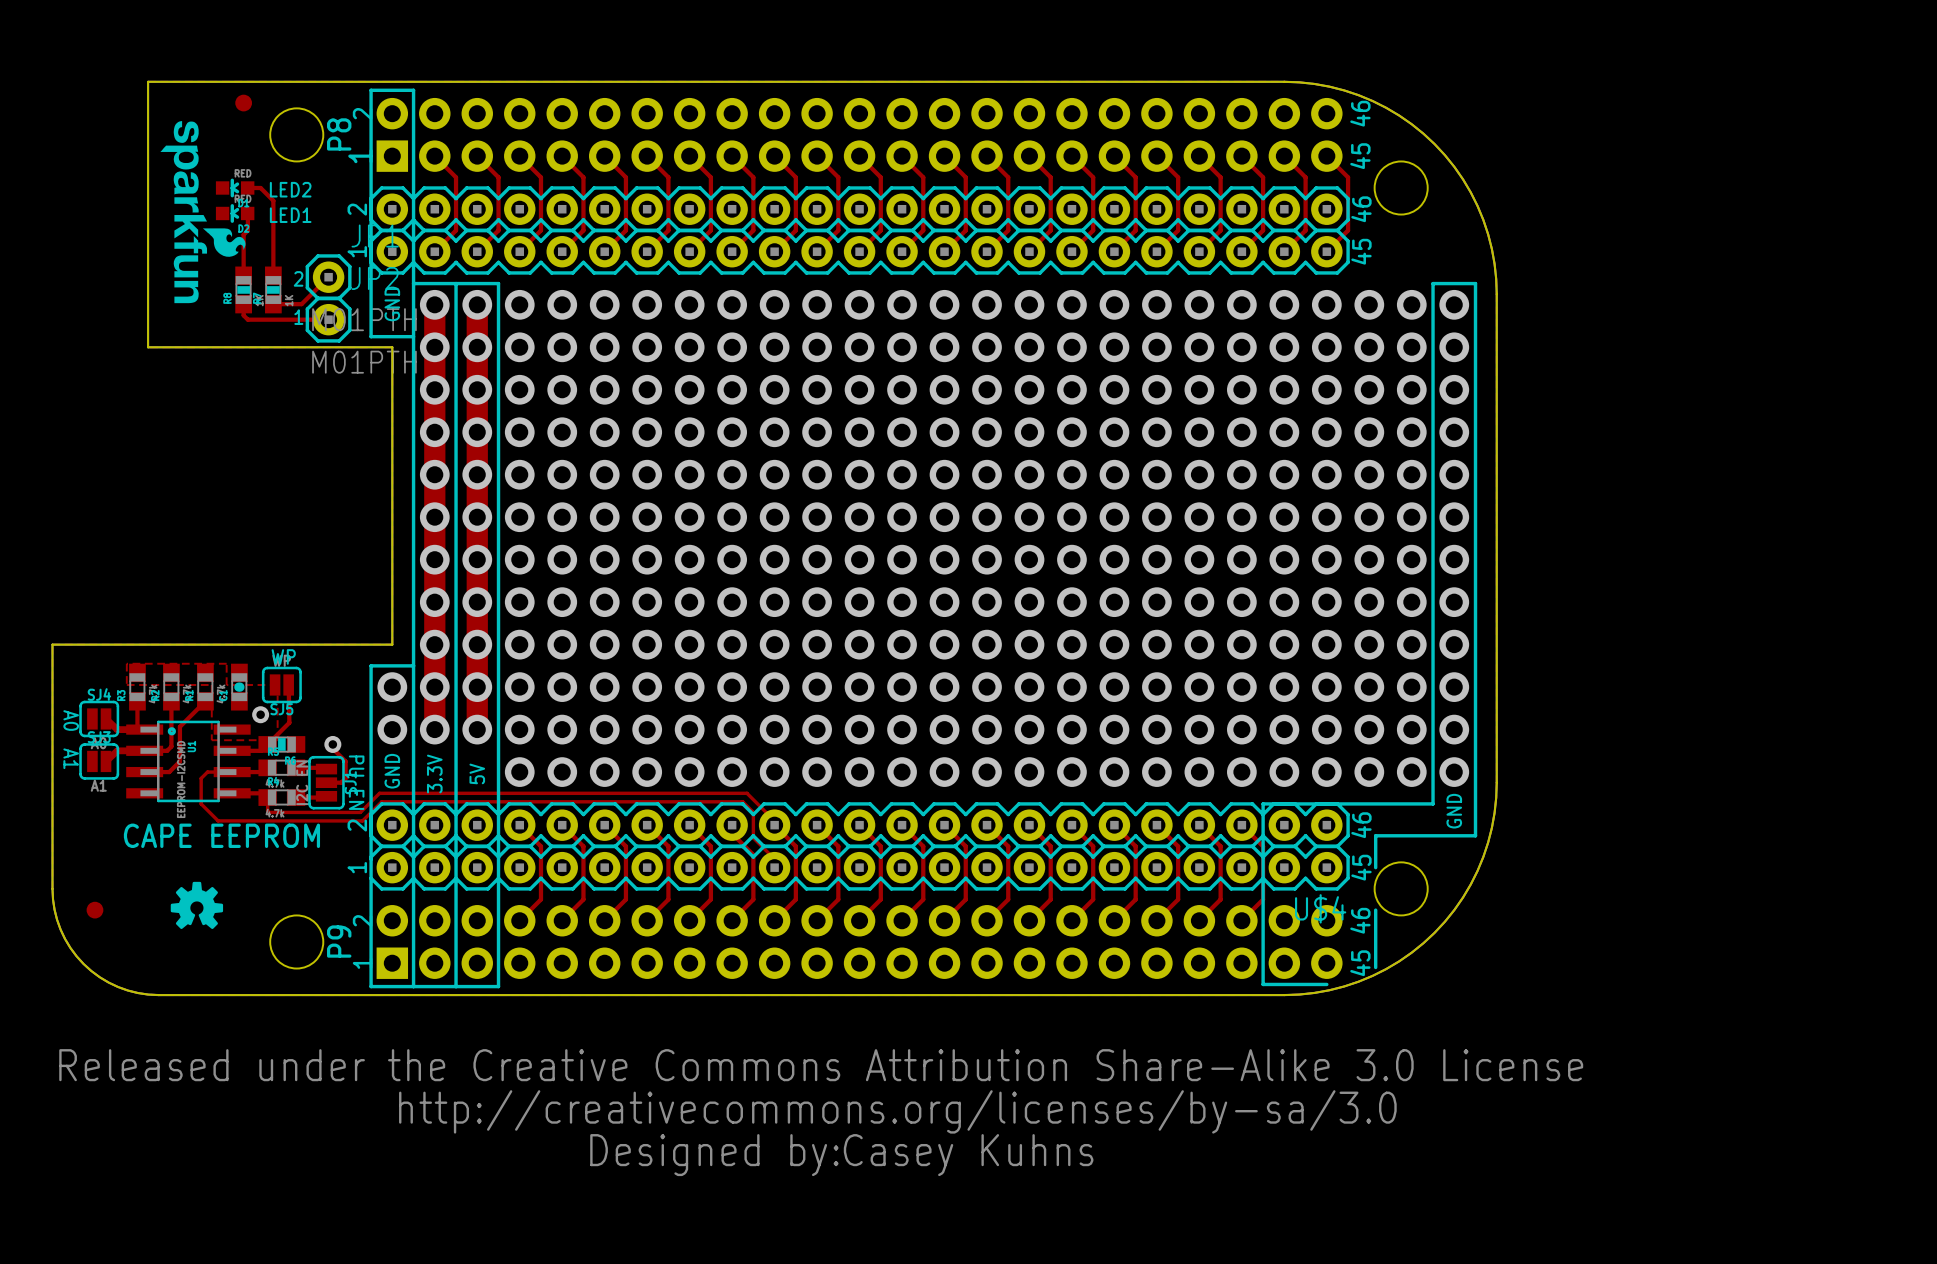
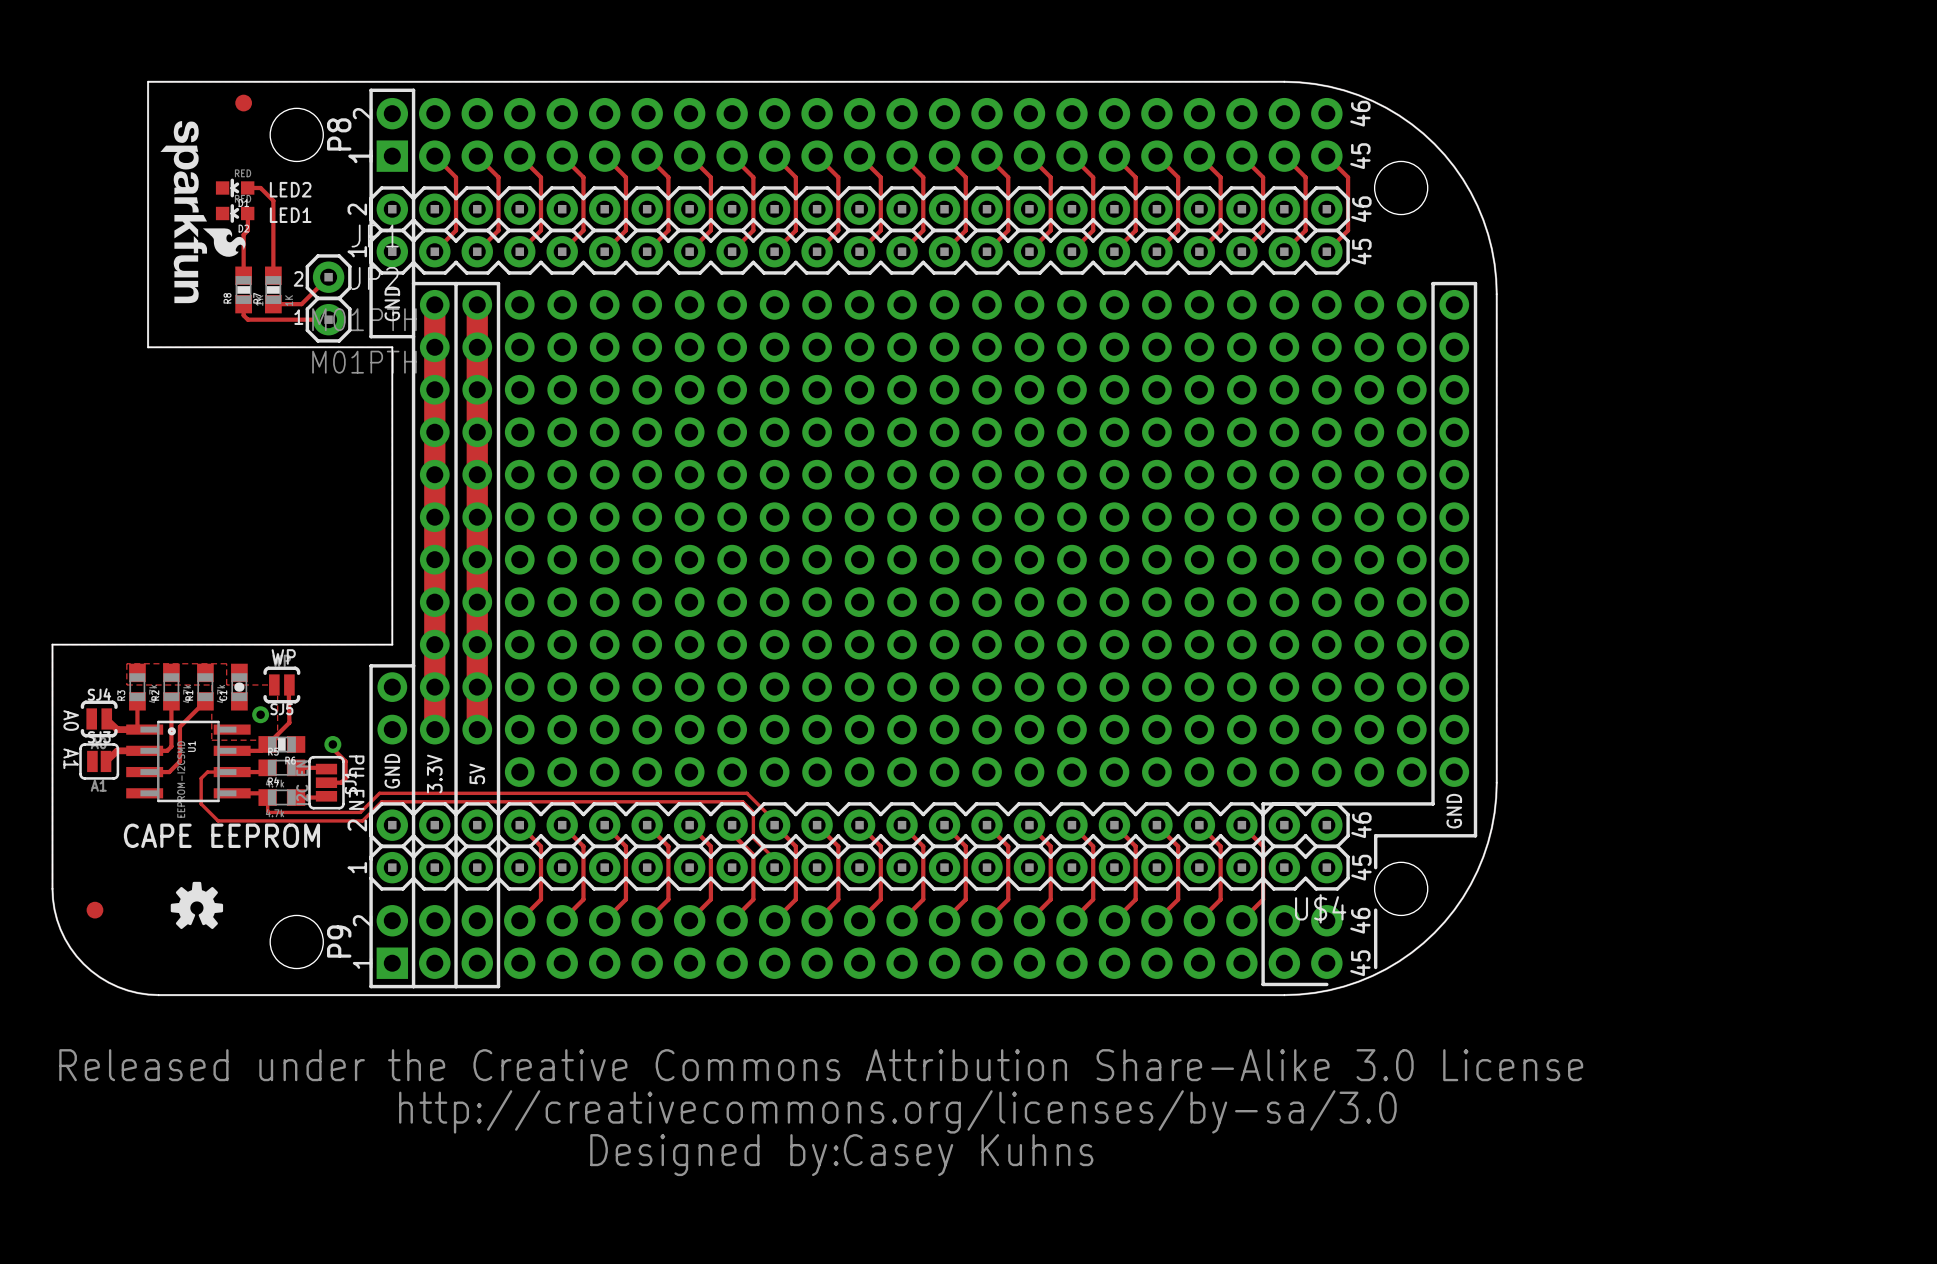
SJ5 footprint: [261, 666, 302, 704] -> [263, 666, 301, 704]
SJ4 footprint: [79, 700, 120, 738] -> [80, 700, 118, 738]

